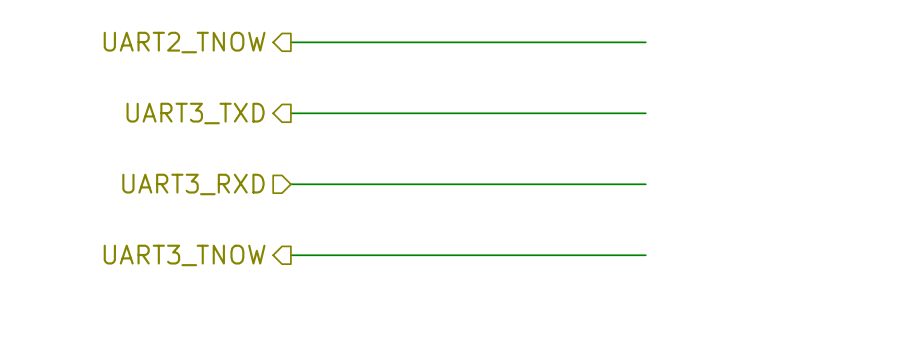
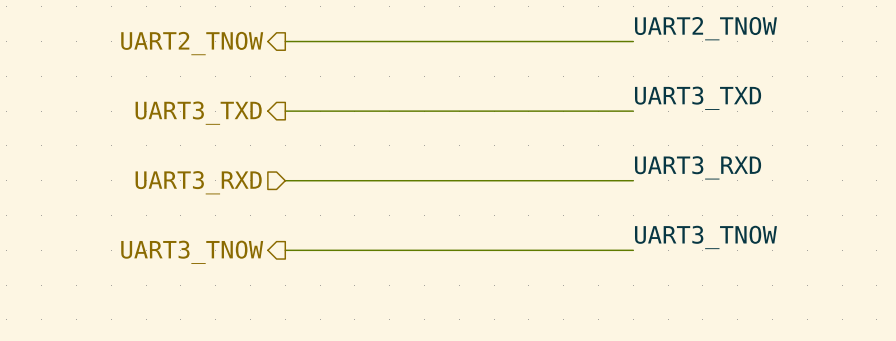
label: none -> UART2_TNOW (705, 28)
label: none -> UART3_TXD (698, 98)
label: none -> UART3_RXD (698, 167)
label: none -> UART3_TNOW (705, 237)

